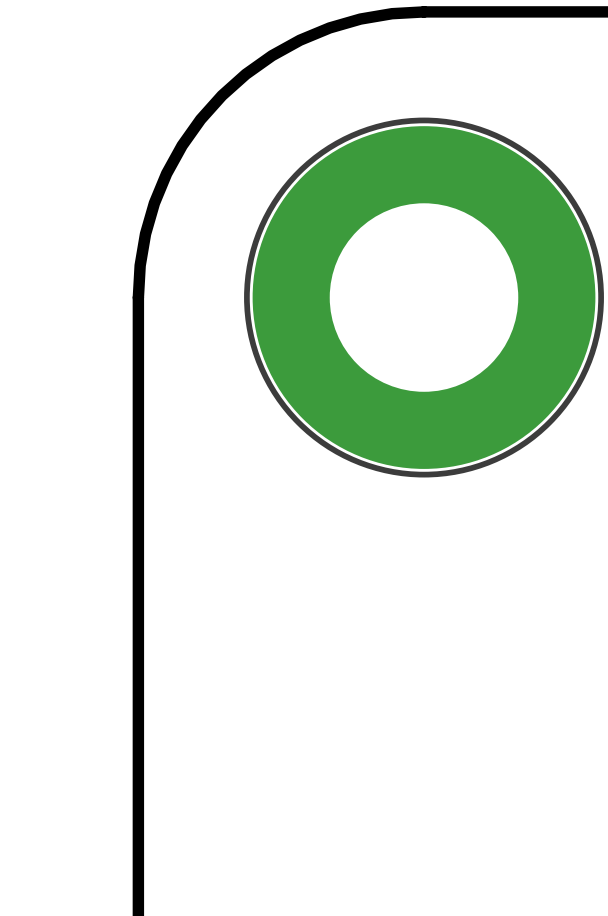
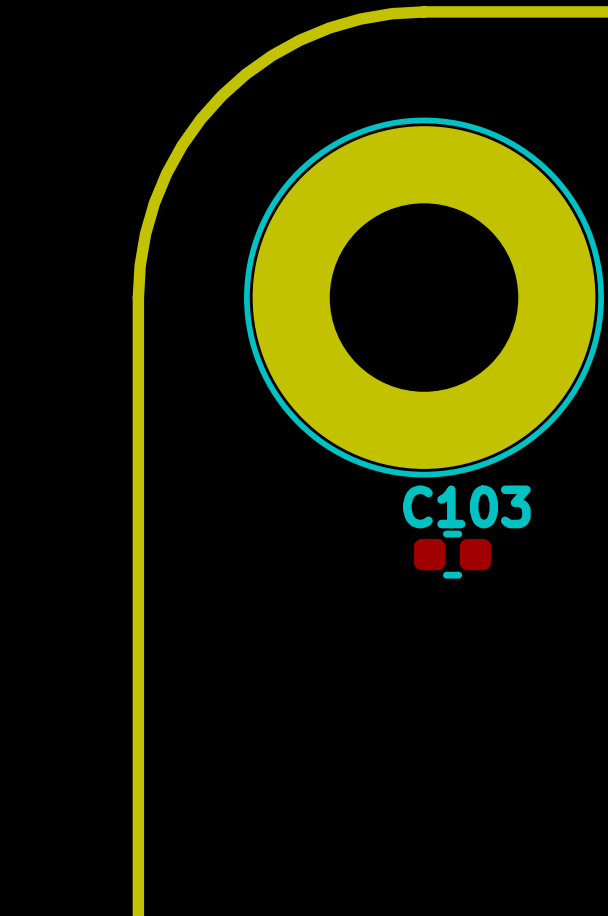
C103: none -> (452, 554)

